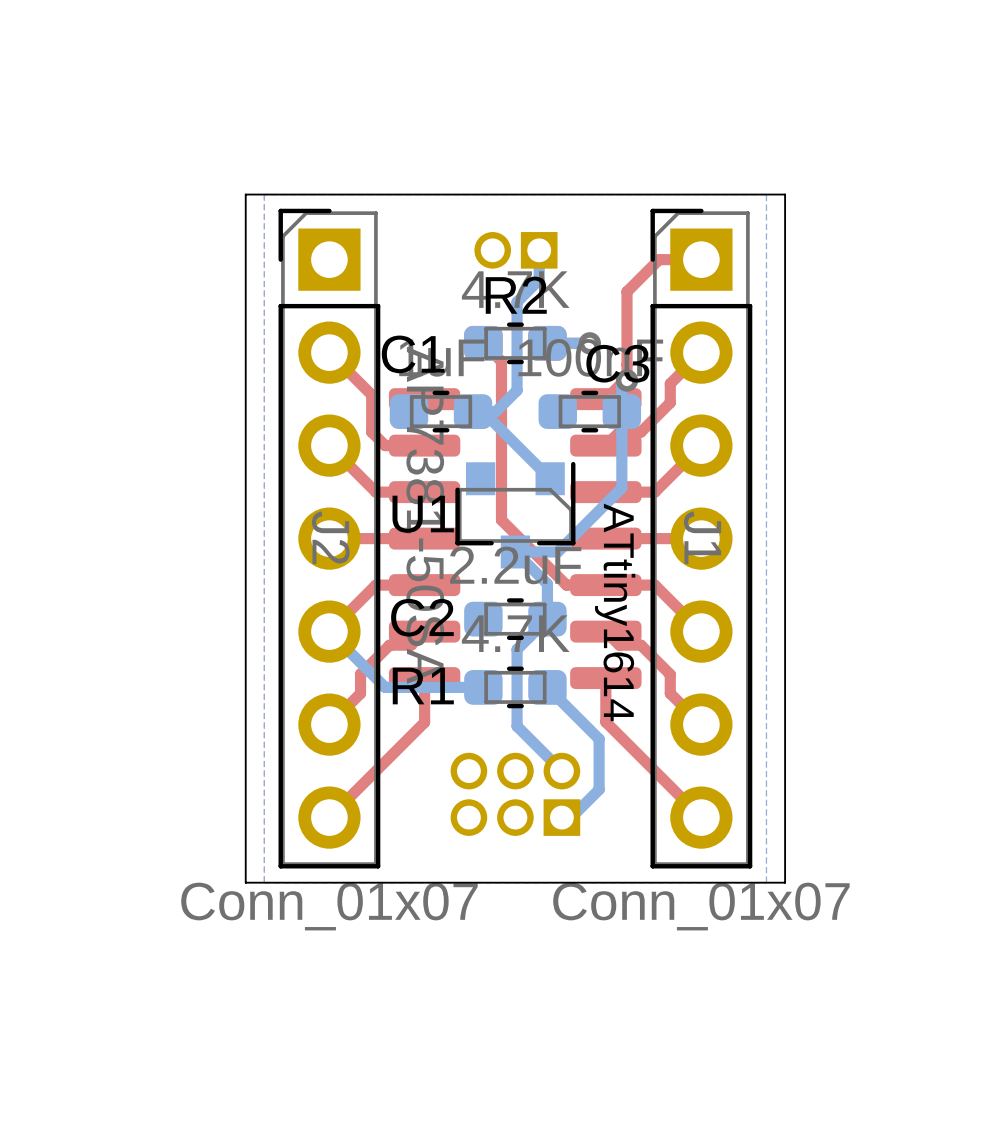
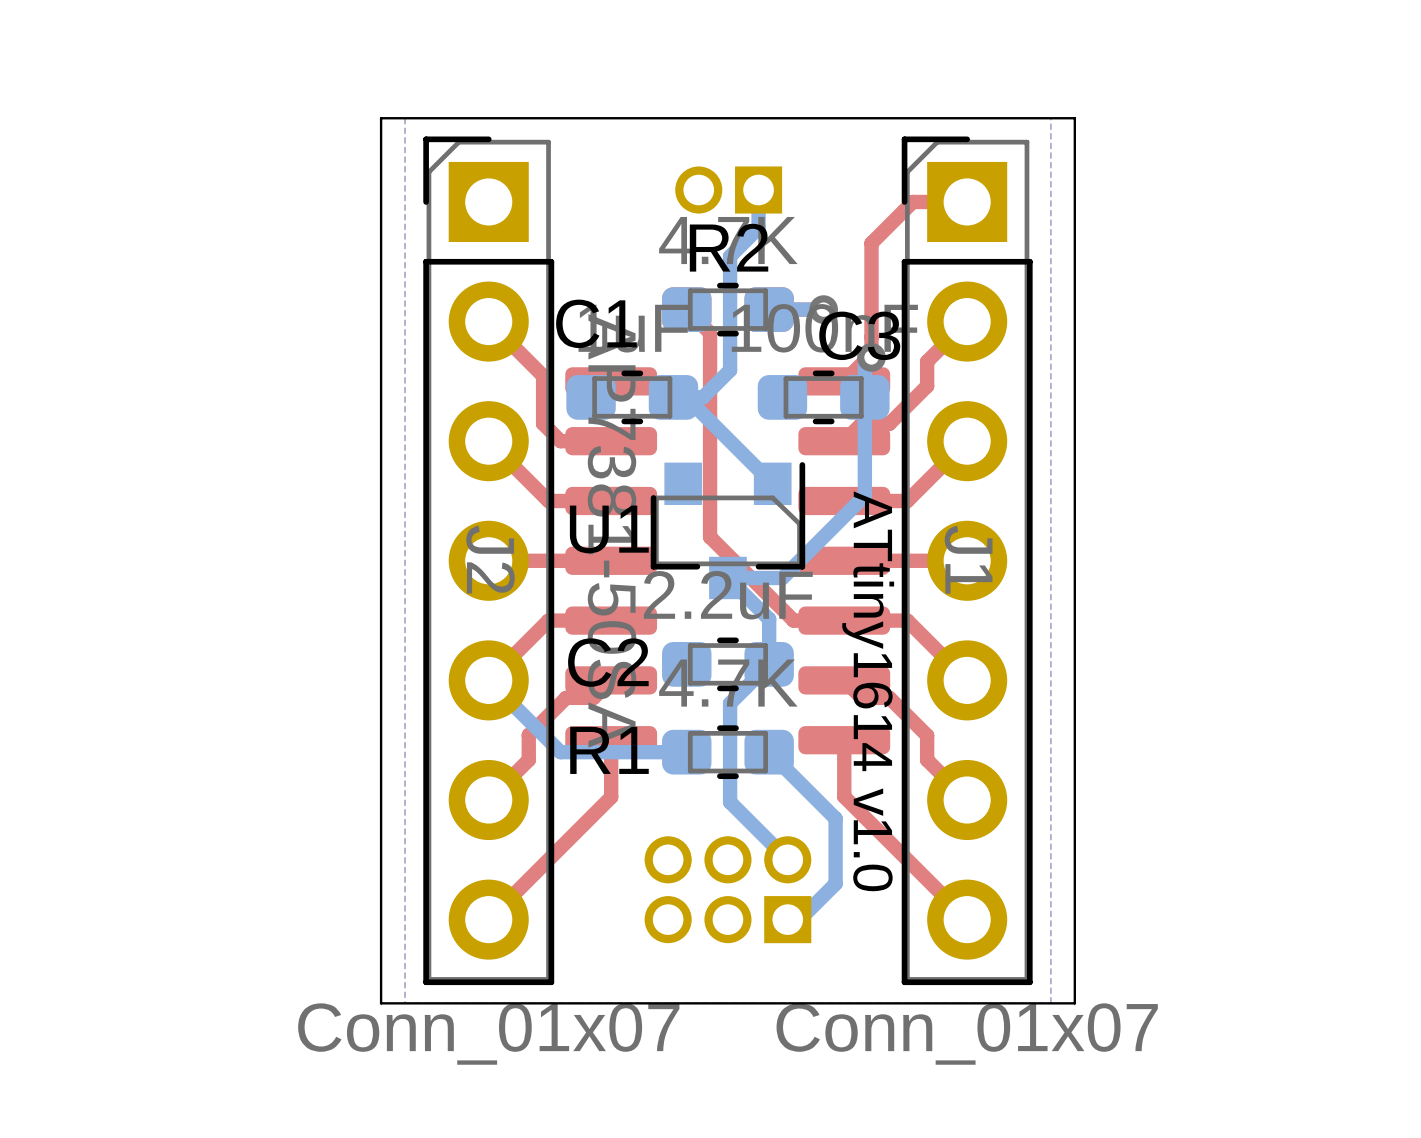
text: ATtiny1614 (615, 612) -> ATtiny1614 v1.0 (868, 691)

